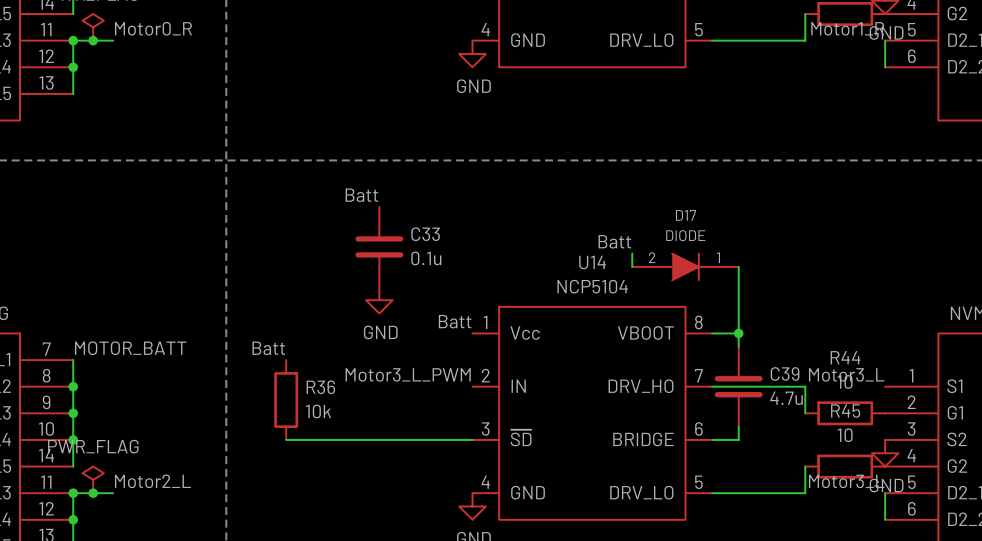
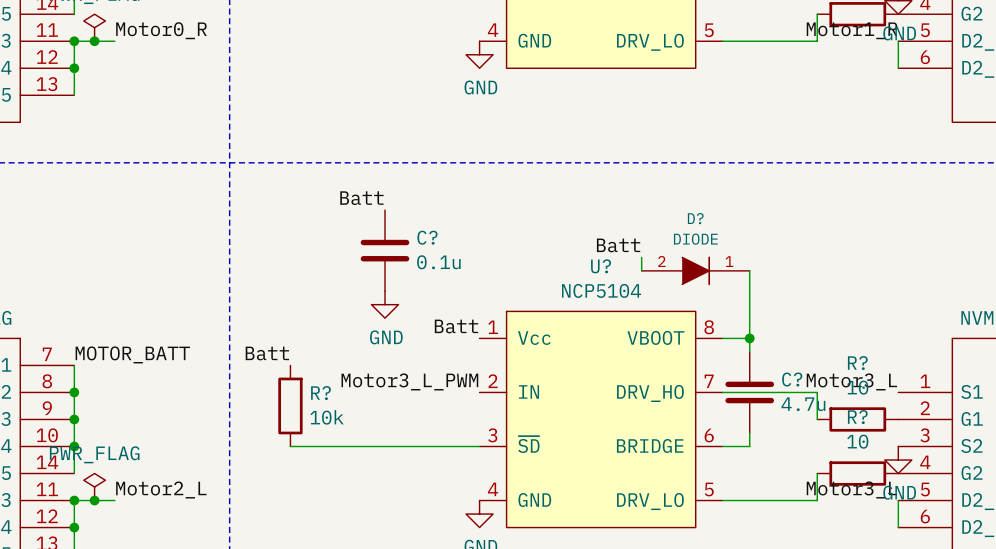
D17 name: D17 (686, 215) -> D? (695, 218)
C33 name: C33 (425, 234) -> C? (427, 237)
U14 name: U14 (592, 262) -> U? (601, 266)
R44 name: R44 (845, 357) -> R? (857, 363)
C39 name: C39 (785, 373) -> C? (792, 379)
R36 name: R36 (320, 387) -> R? (320, 393)
R45 name: R45 (845, 411) -> R? (857, 417)

